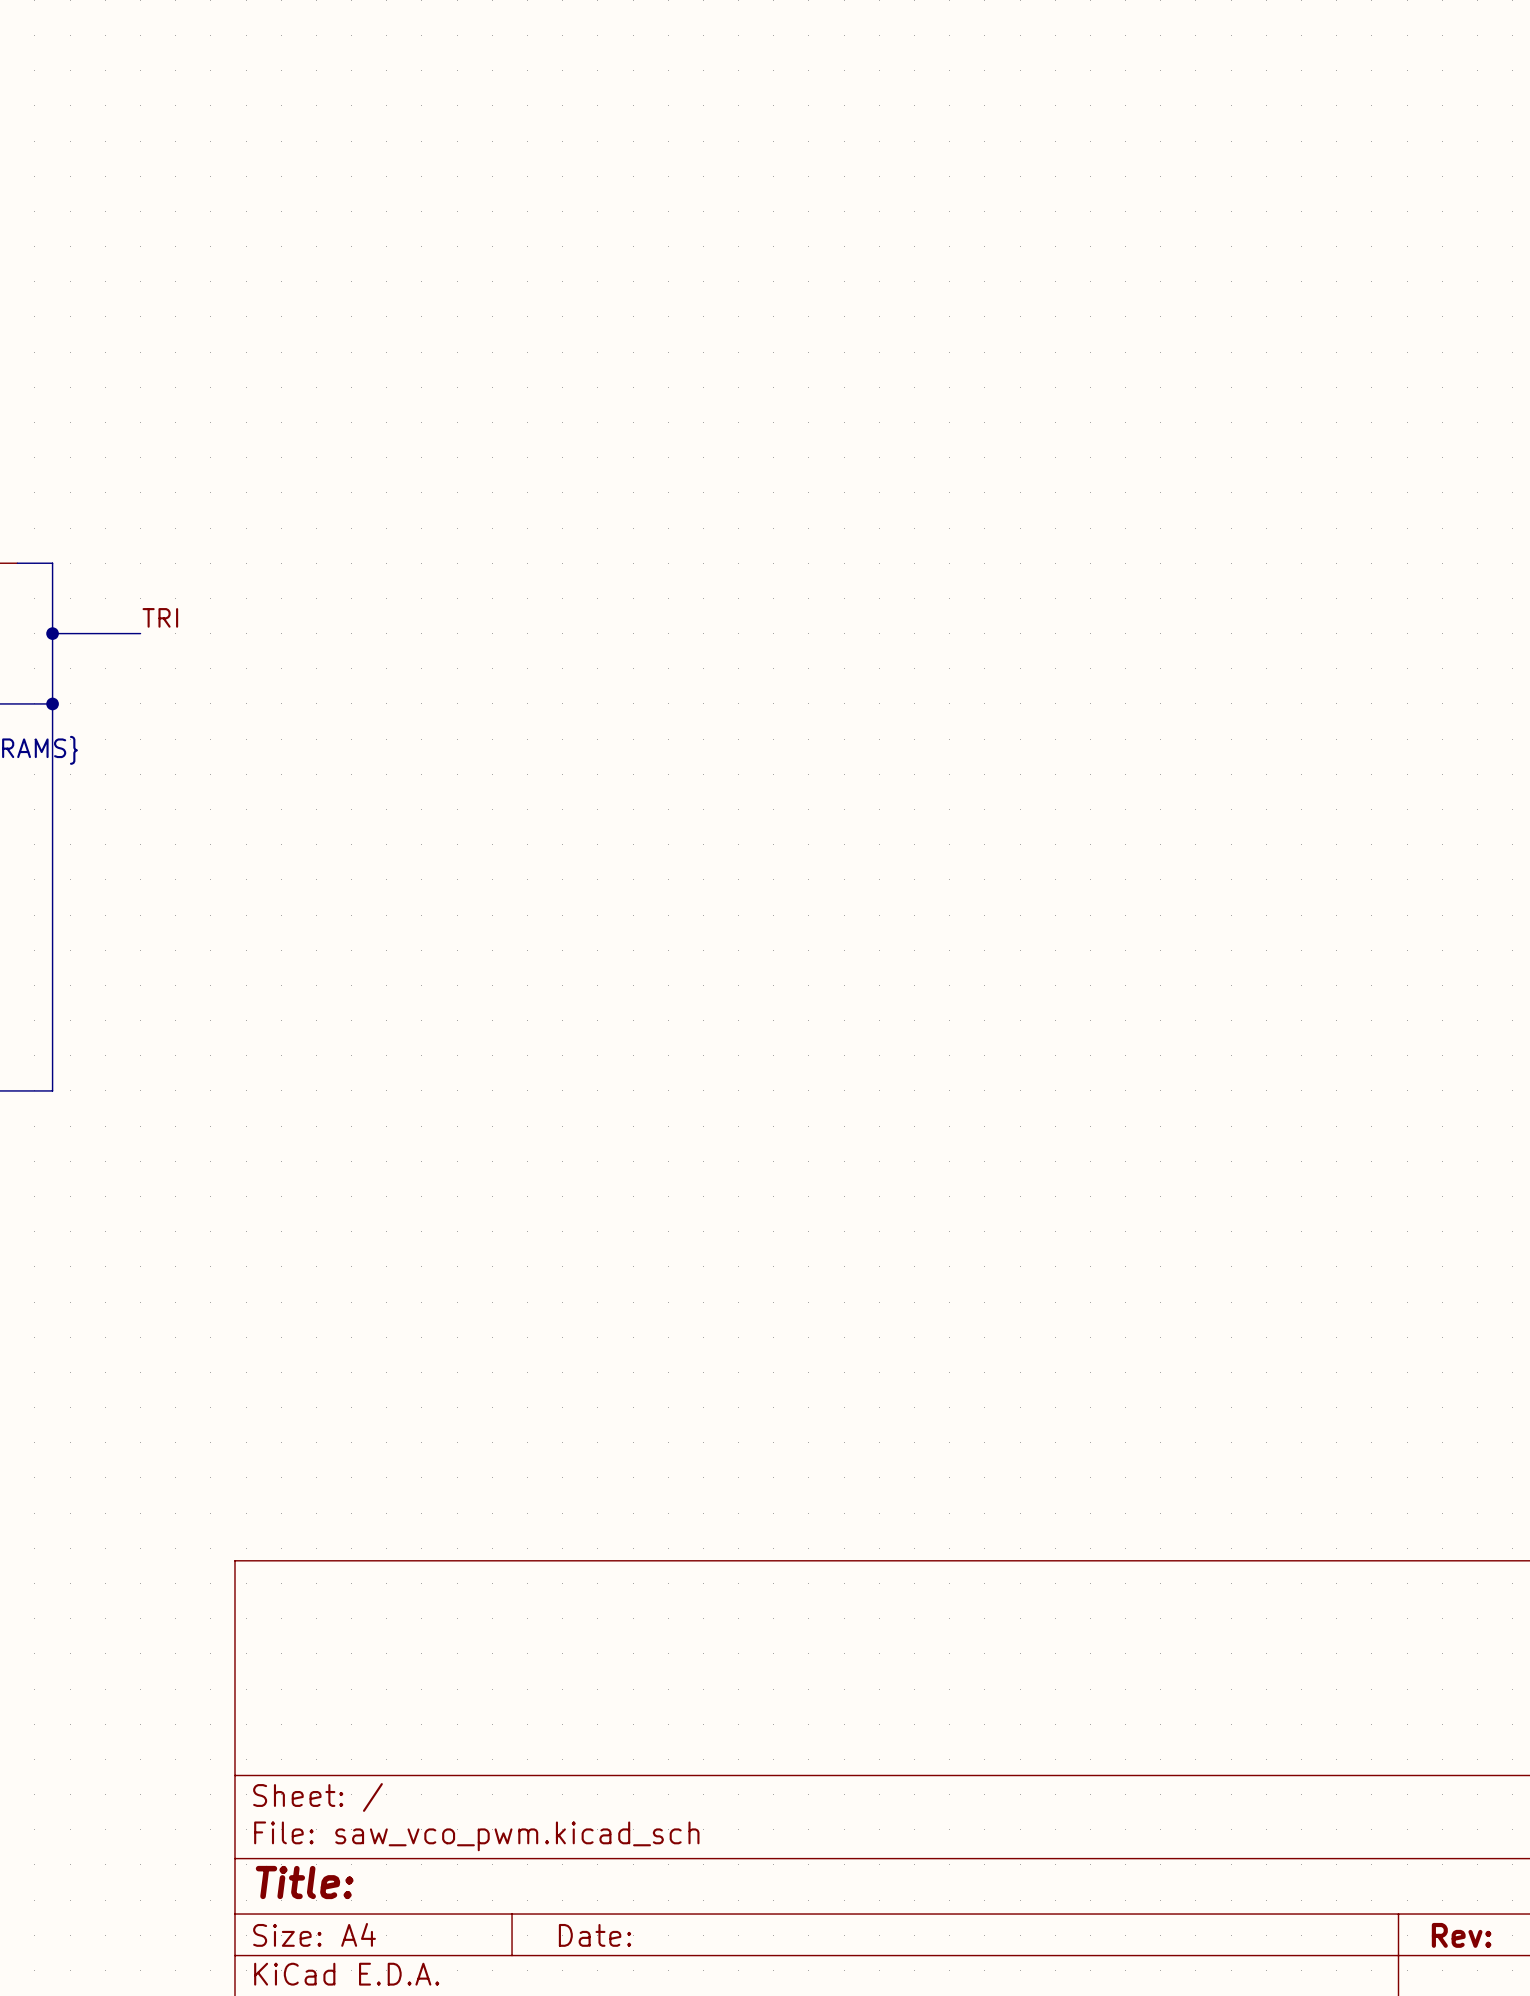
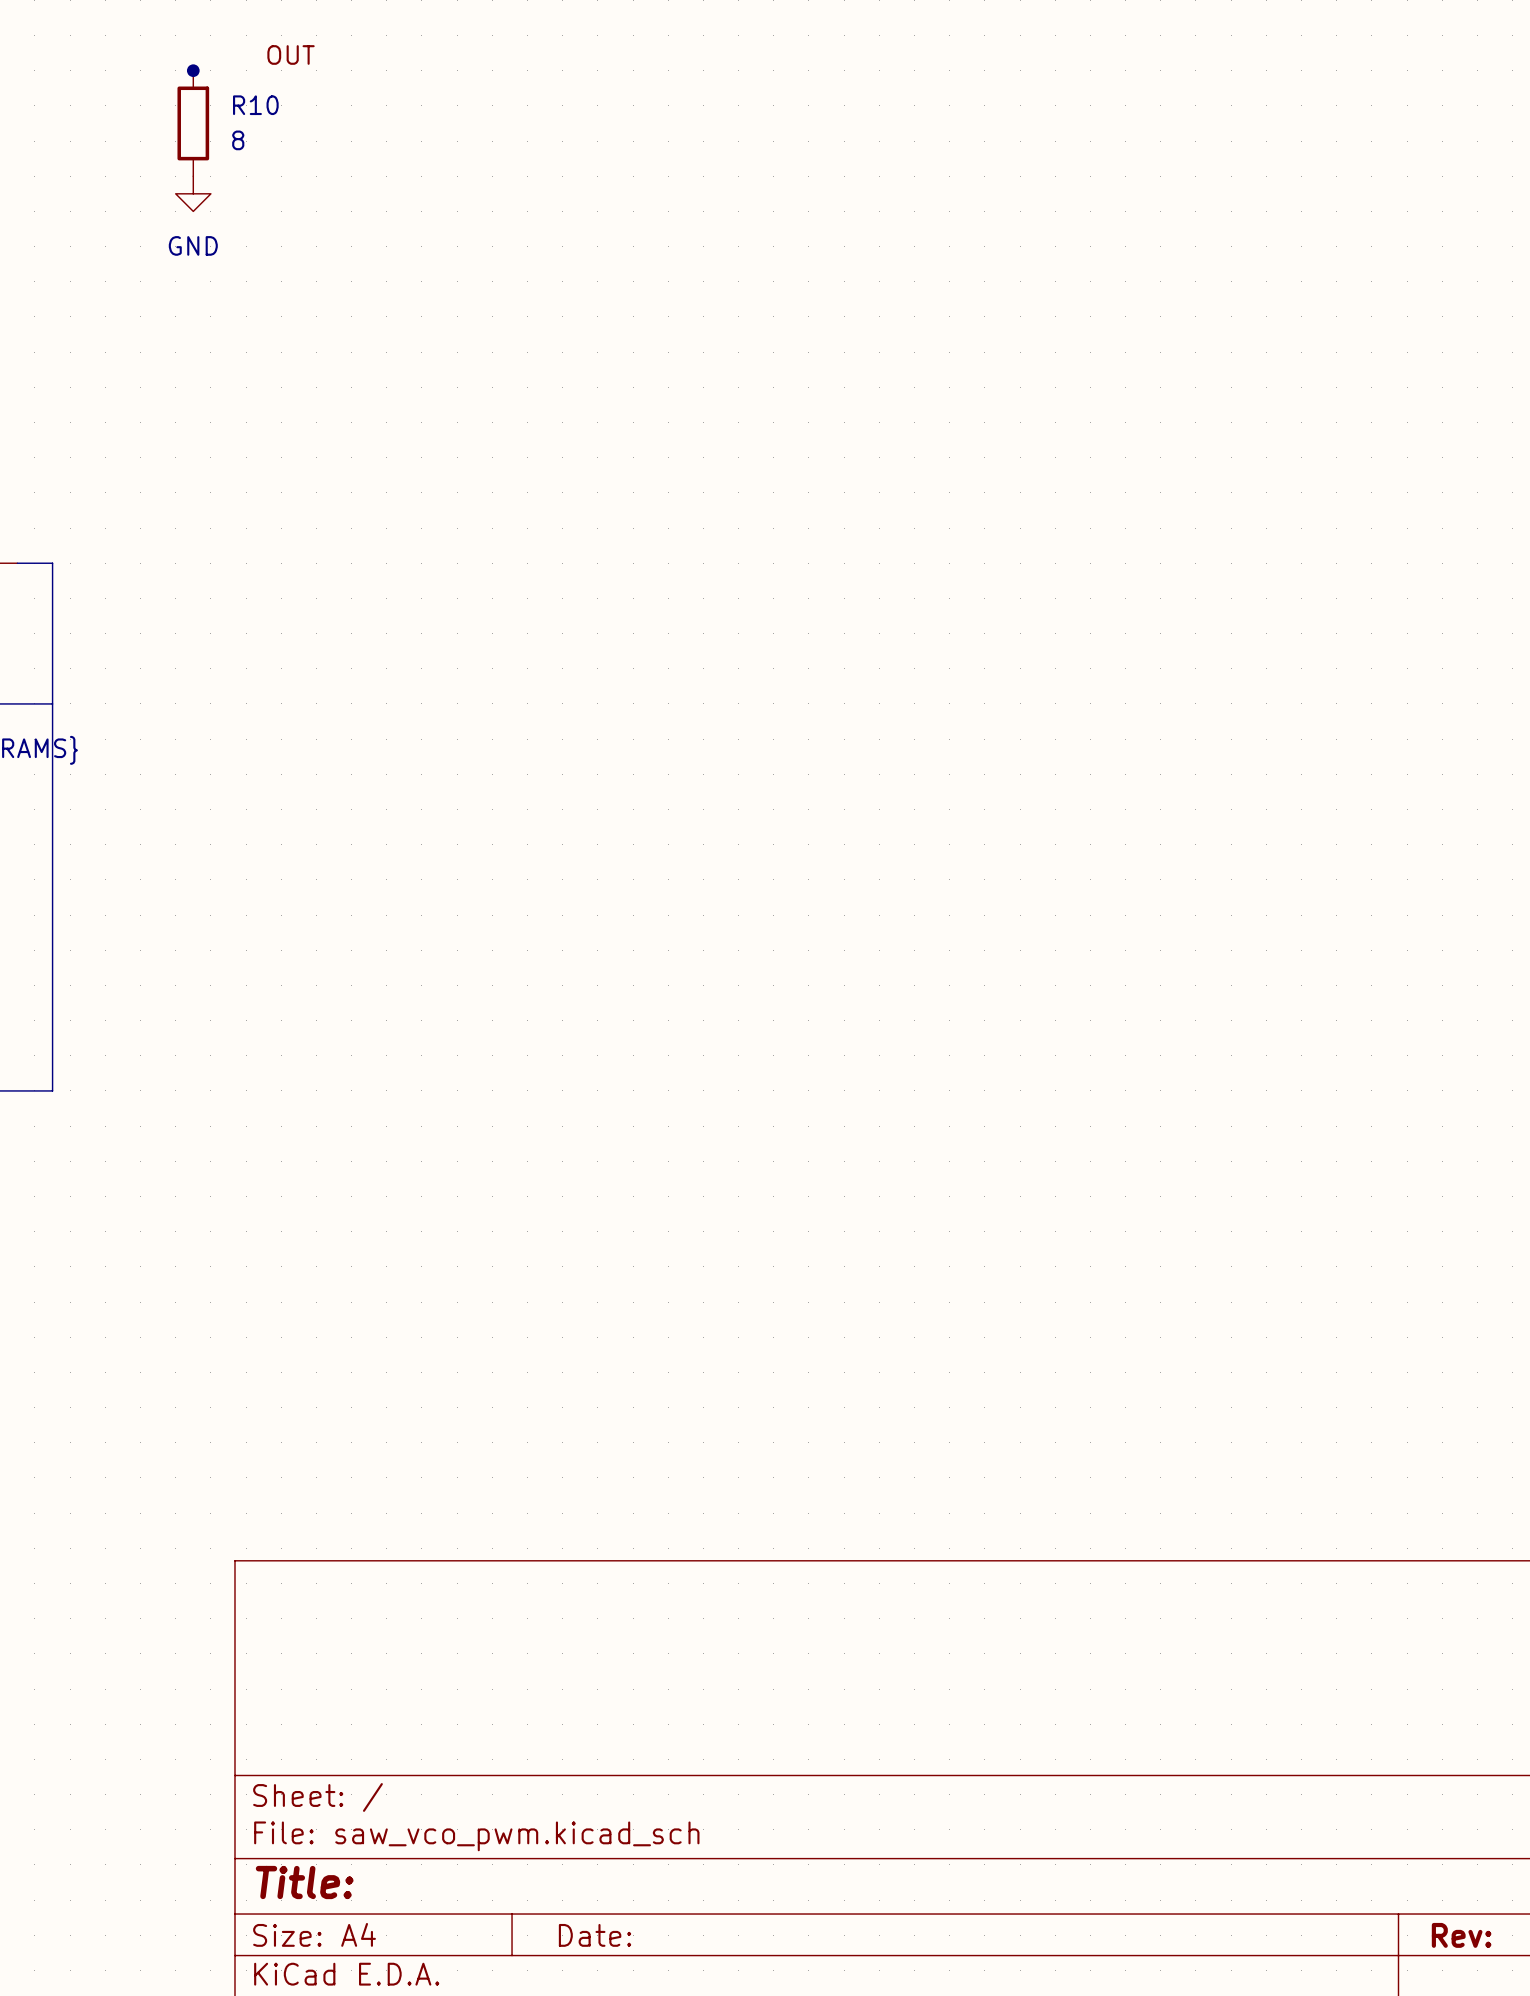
label: none -> OUT (291, 54)
junction: none -> (193, 70)
R10: none -> 8 (193, 123)
power symbol: none -> GND (193, 193)
label: TRI (160, 617) -> none
wire: (52, 633) (140, 633) -> none
junction: (52, 633) -> none
junction: (52, 703) -> none

